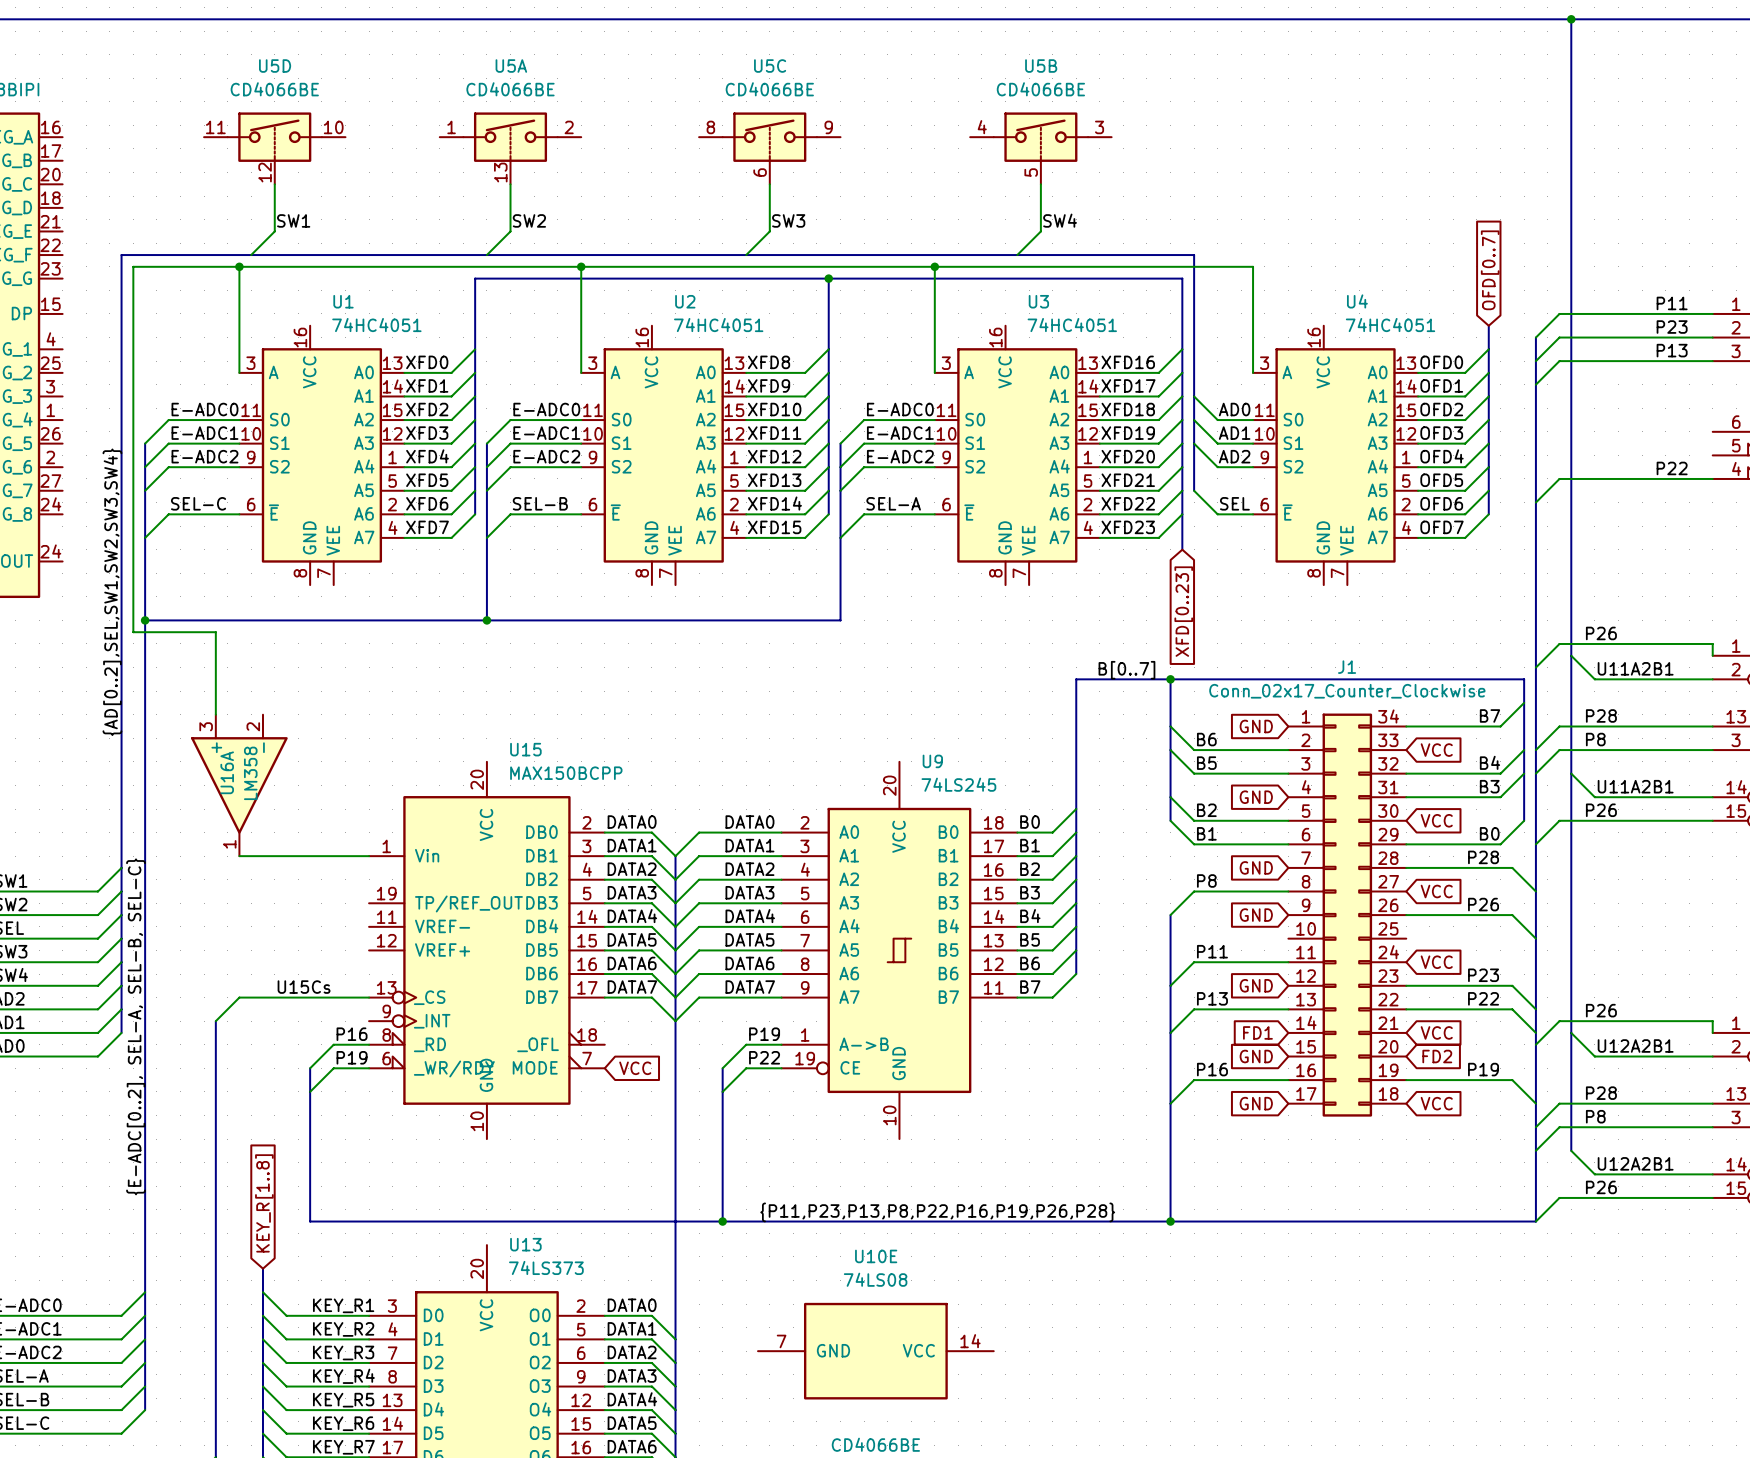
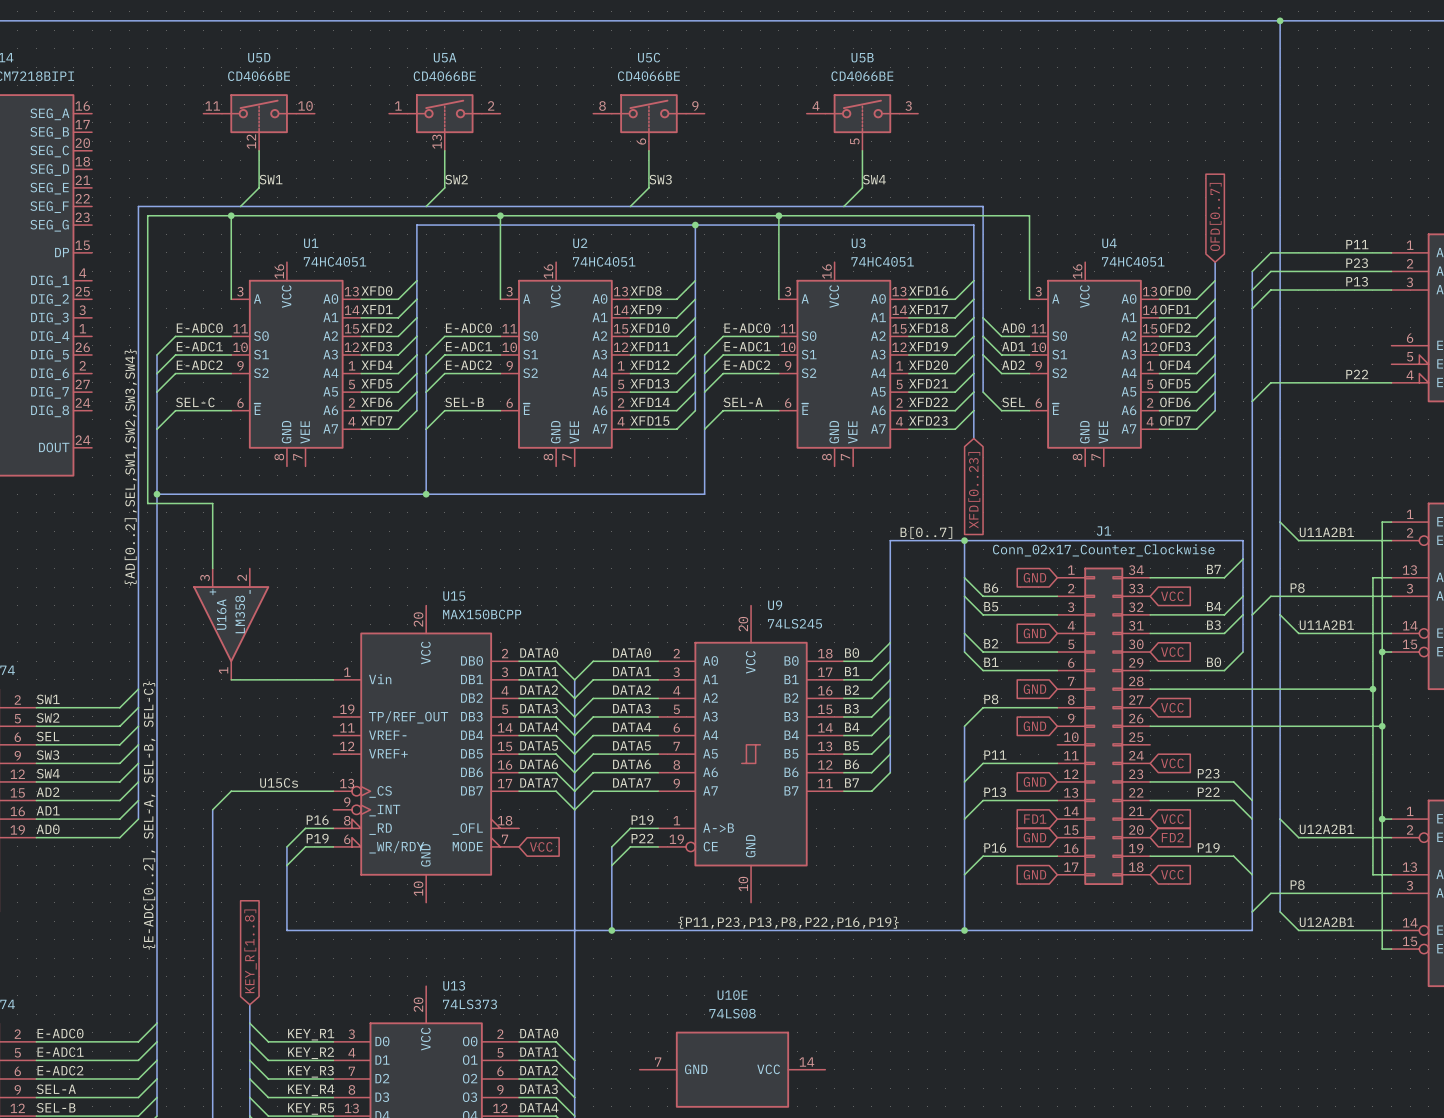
label: P26 (1601, 633) -> none
wire: (1712, 655) (1712, 643) (1559, 643) (1535, 667) -> (1391, 522) (1382, 522) (1382, 949)
label: P28 (1601, 715) -> none
wire: (1689, 726) (1559, 726) (1535, 750) -> (1372, 577) (1372, 874)
label: P26 (1601, 810) -> none
wire: (1700, 820) (1559, 820) (1535, 844) -> none
junction: none -> (1382, 652)
label: P28 (1483, 857) -> none
wire: (1512, 867) (1535, 891) -> (1233, 689) (1372, 689)
junction: none -> (1372, 689)
label: P26 (1483, 904) -> none
wire: (1512, 915) (1535, 938) -> (1233, 726) (1382, 726)
junction: none -> (1382, 726)
label: P26 (1601, 1010) -> none
junction: none -> (1382, 819)
wire: (1712, 1032) (1712, 1021) (1559, 1021) (1535, 1044) -> (1391, 819) (1382, 819)
label: P28 (1601, 1093) -> none
wire: (1689, 1103) (1559, 1103) (1535, 1127) -> none
label: none -> {P11,P23,P13,P8,P22,P16,P19} (788, 922)
bus: (310, 1174) (310, 1221) (1535, 1221) (1535, 1174) -> (286, 930) (1252, 930)
bus: (722, 1174) (722, 1221) -> none
bus: (1170, 1174) (1170, 1221) -> none
label: P26 (1601, 1187) -> none
wire: (1700, 1197) (1559, 1197) (1535, 1221) -> none
label: {P11,P23,P13,P8,P22,P16,P19,P26,P28} (937, 1212) -> none
junction position: (722, 1221) -> (611, 930)
junction position: (1170, 1221) -> (964, 930)

